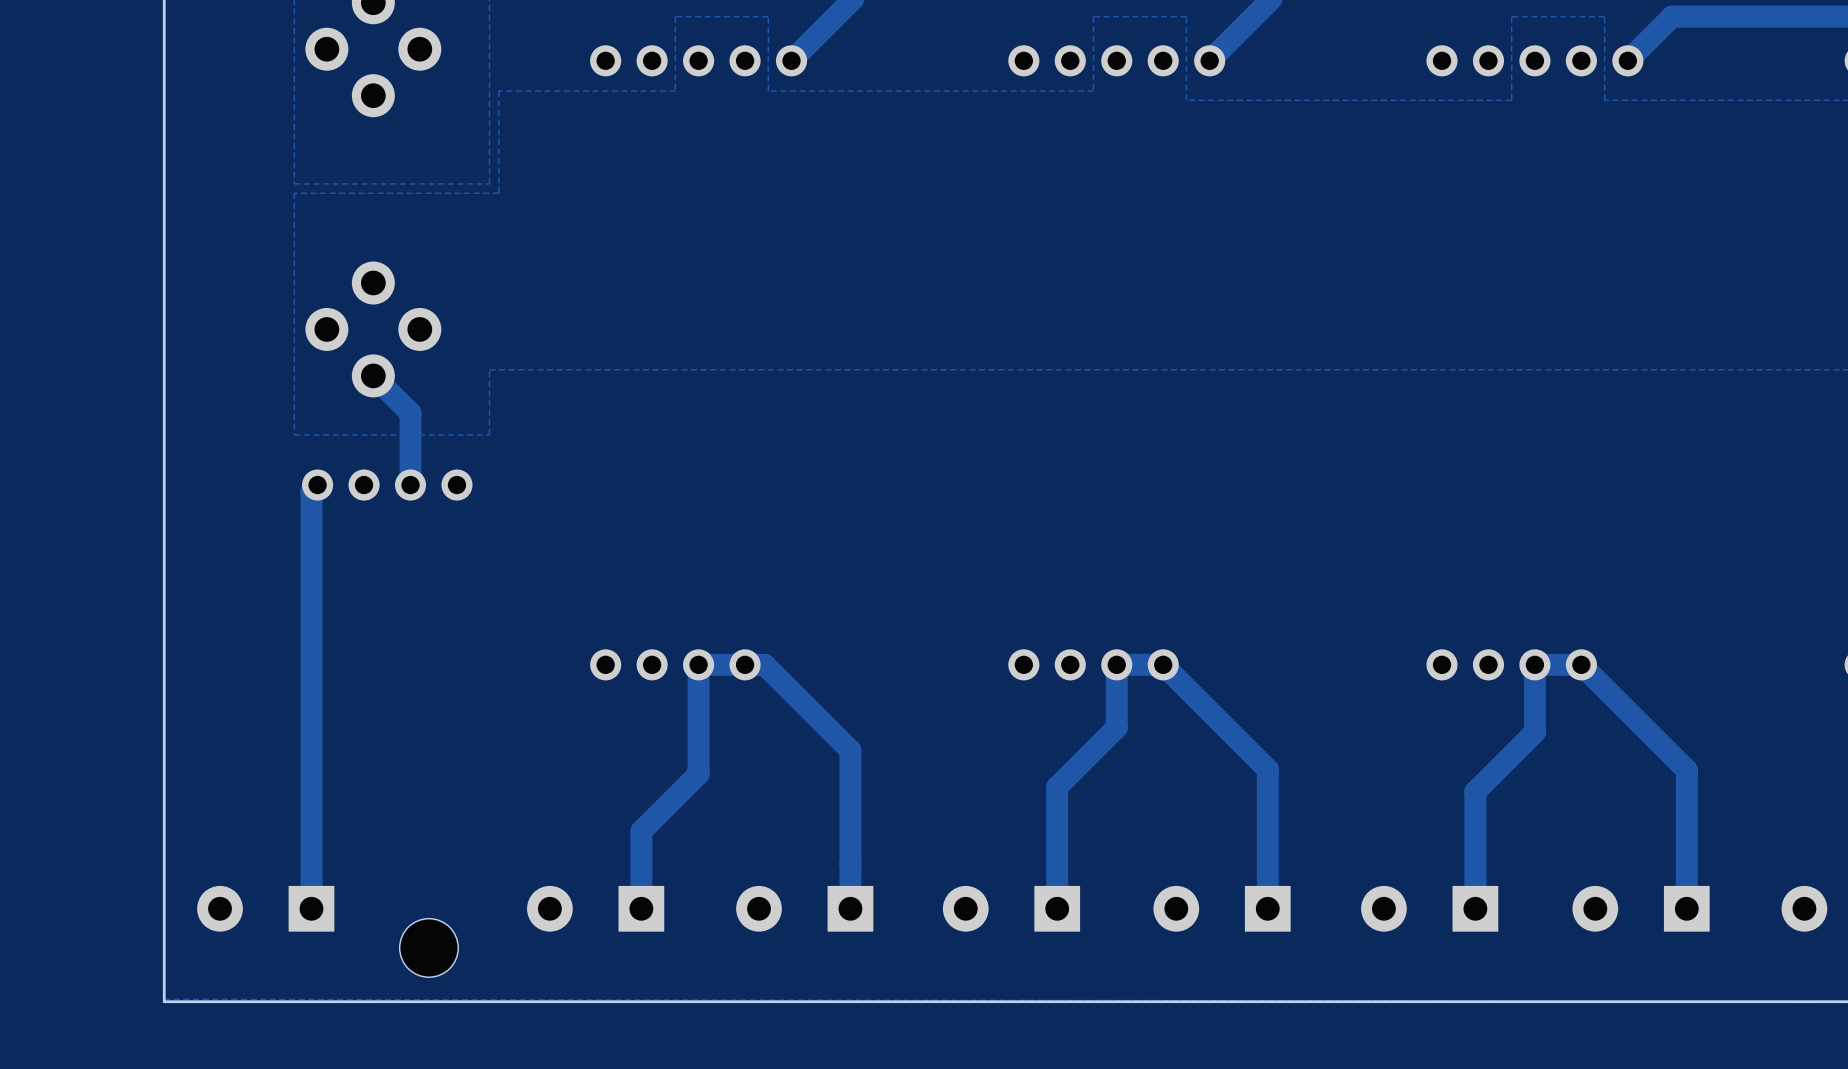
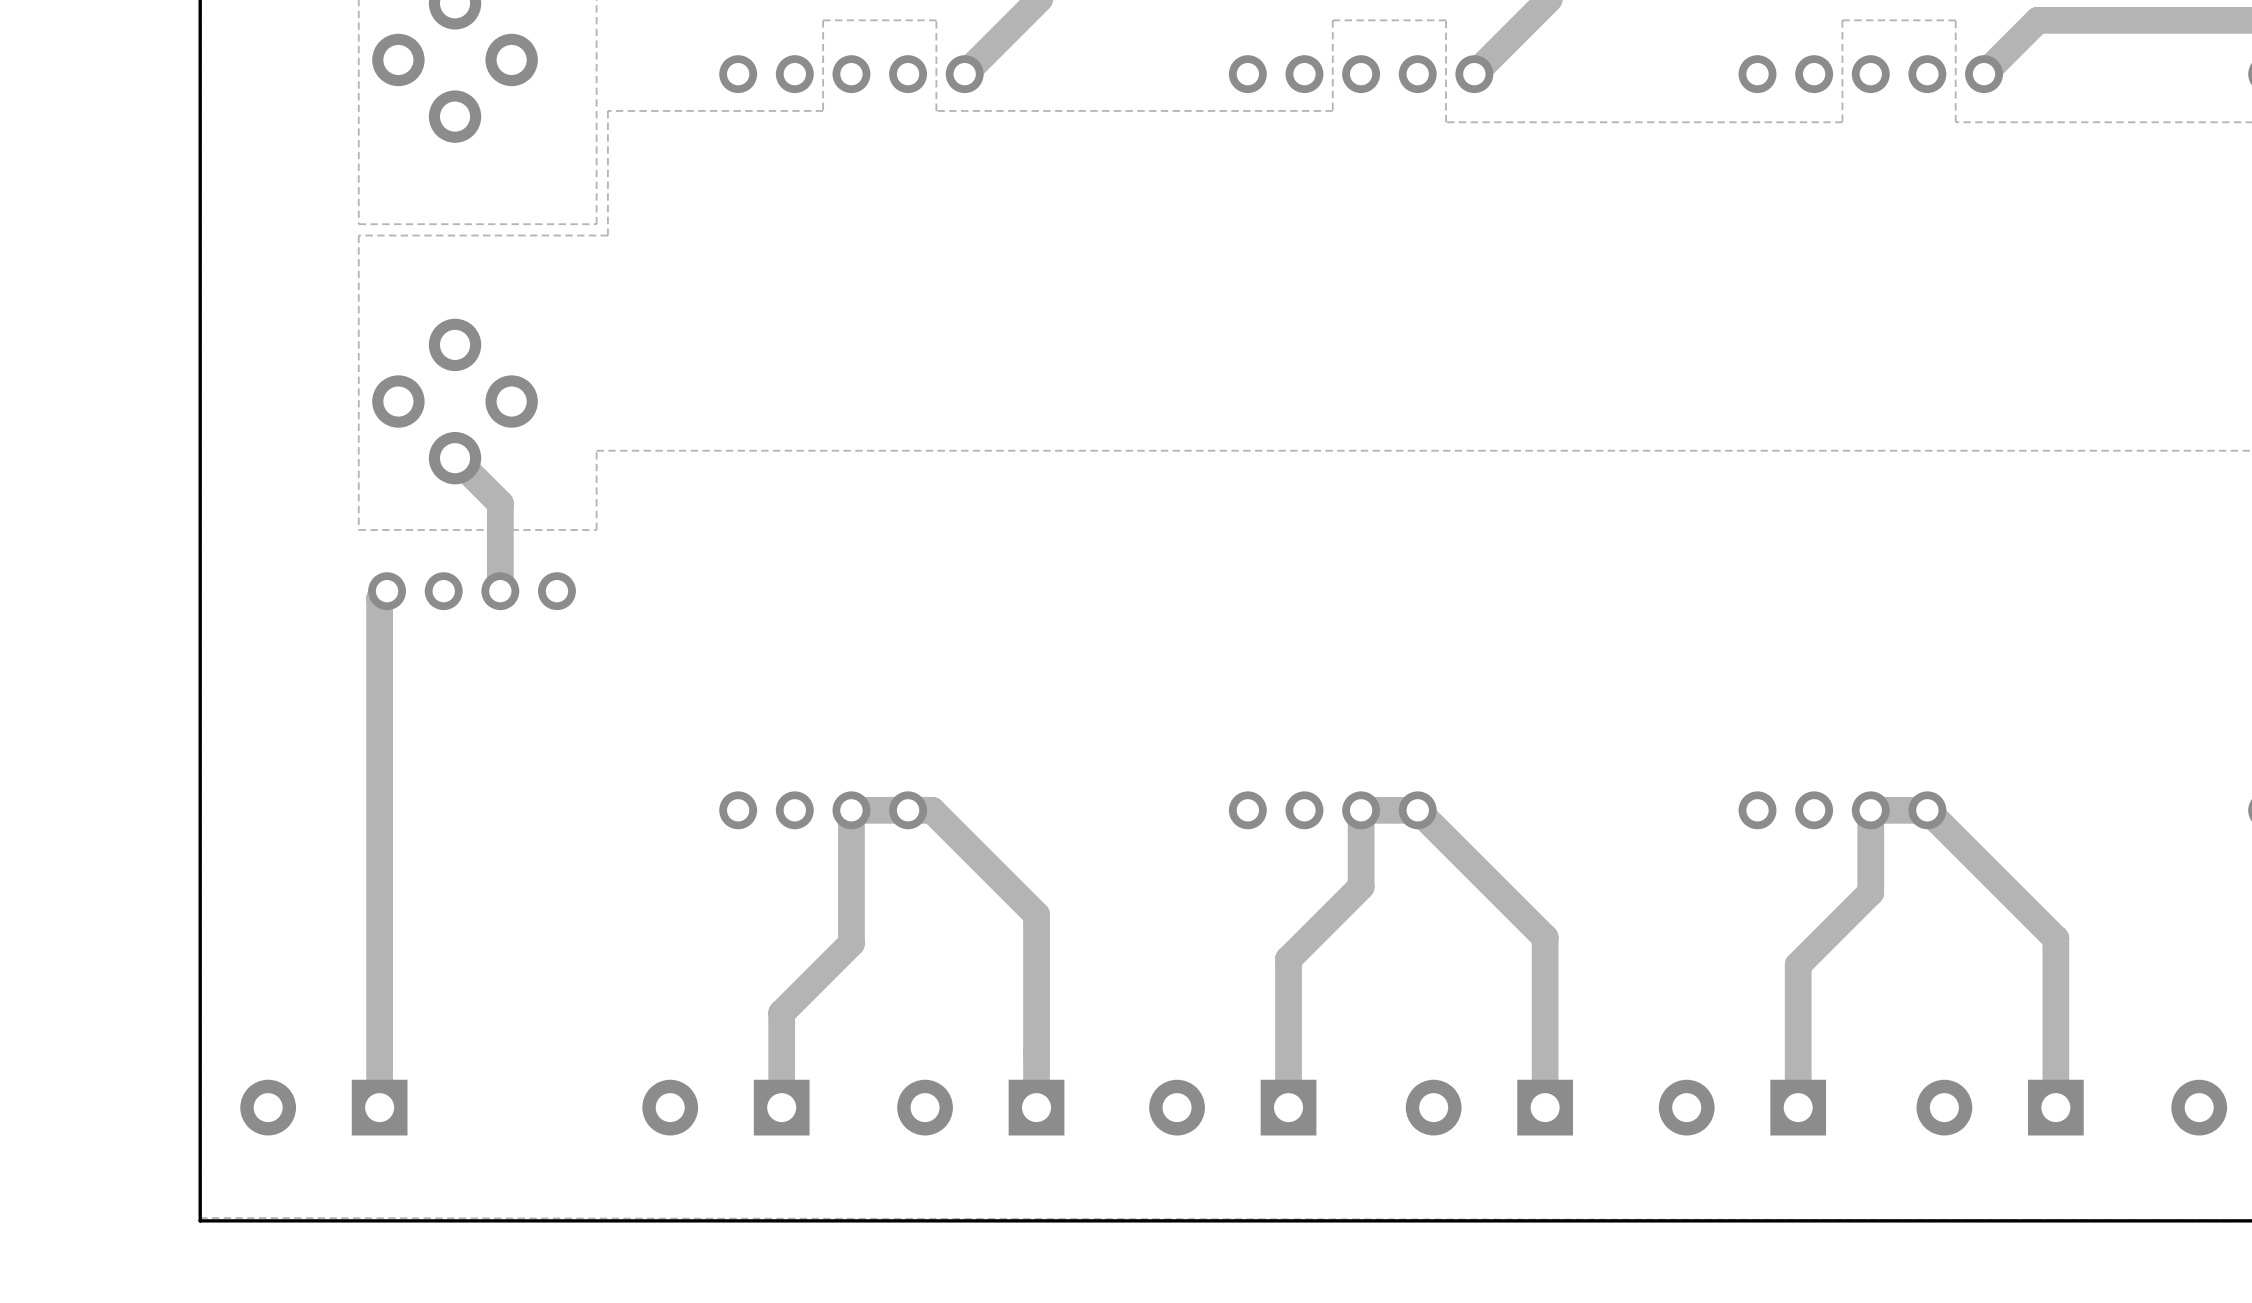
part: (428, 947) -> none

